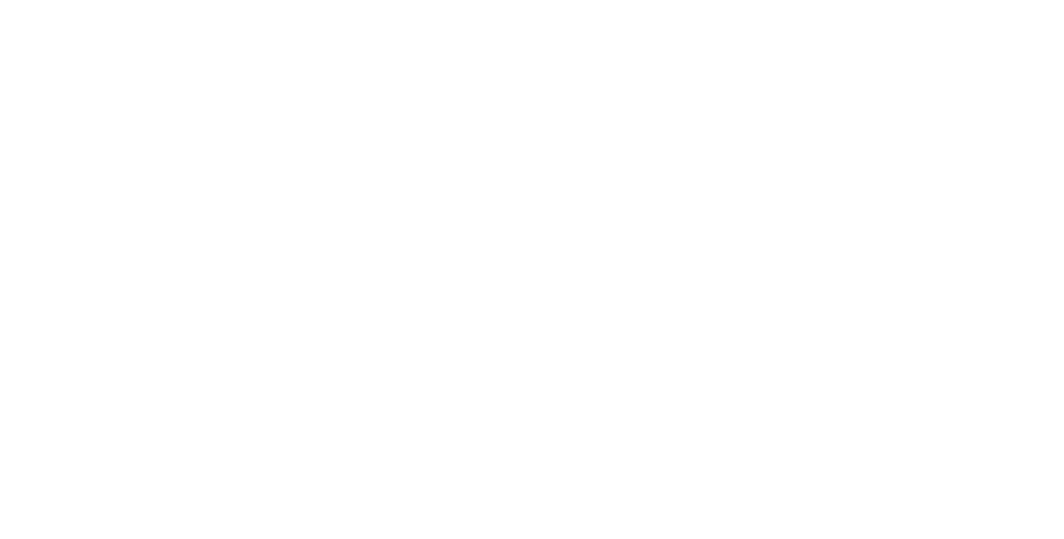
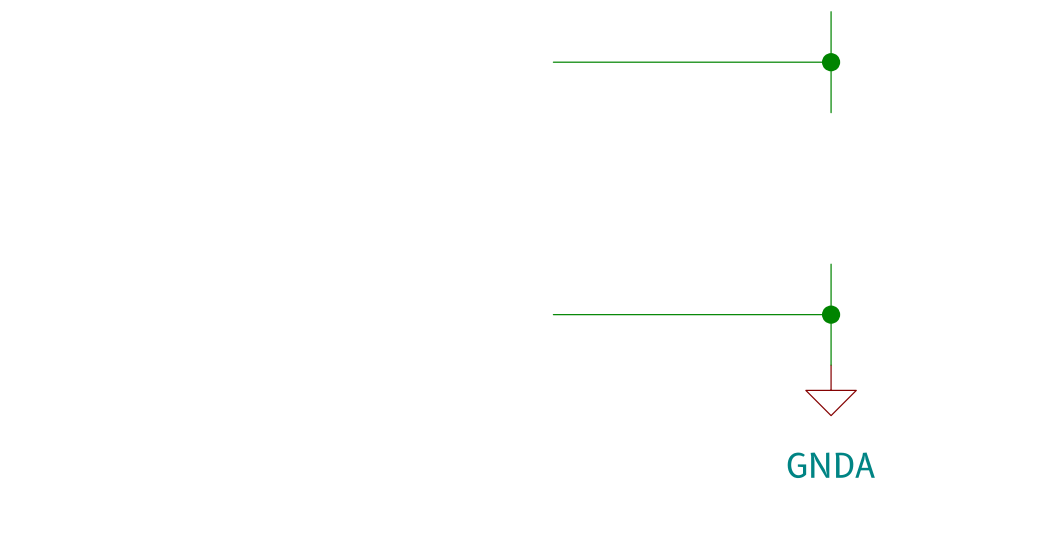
wire: none -> (831, 11) (831, 112)
wire: none -> (553, 62) (831, 62)
junction: none -> (831, 62)
wire: none -> (831, 264) (831, 365)
wire: none -> (553, 314) (831, 314)
junction: none -> (831, 314)
power symbol: none -> GNDA (831, 390)

